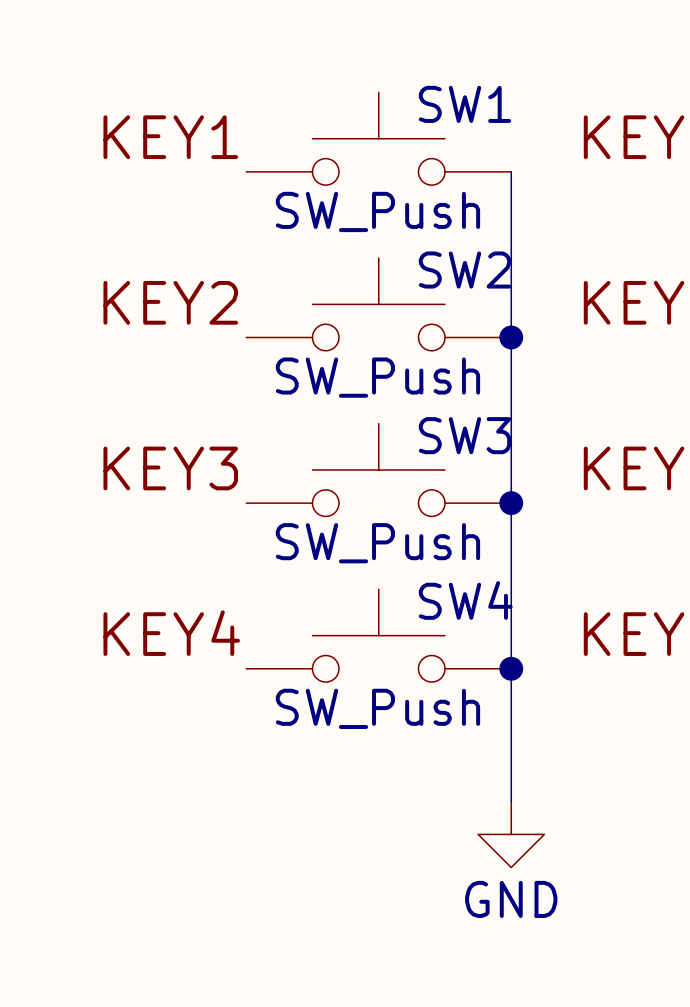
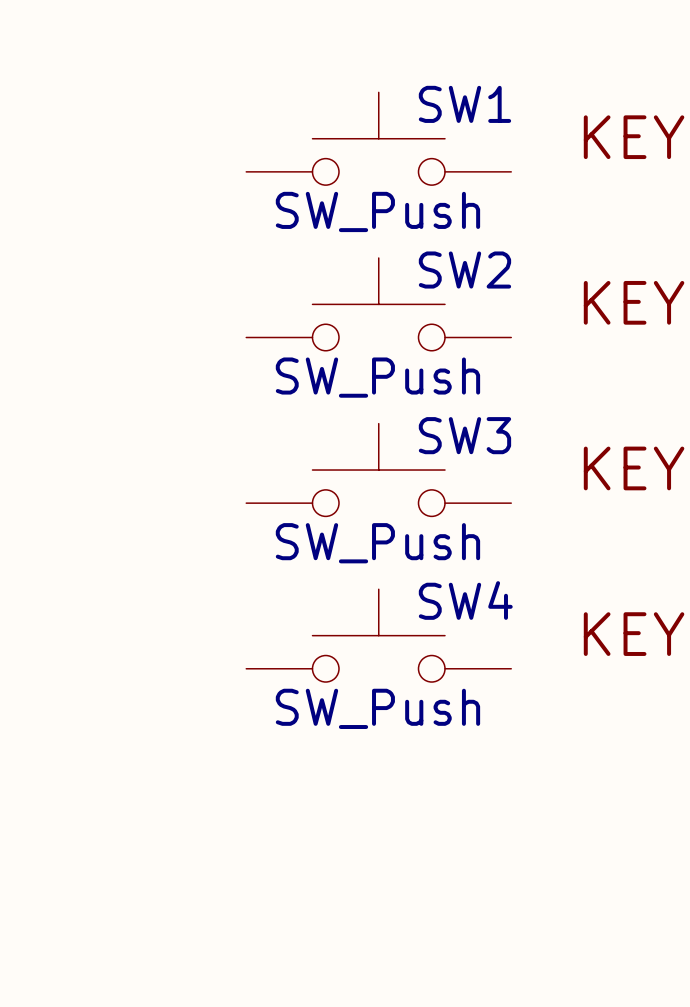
label: KEY1 (170, 137) -> none
wire: (511, 171) (511, 801) -> none
label: KEY2 (170, 302) -> none
junction: (511, 337) -> none
label: KEY3 (170, 468) -> none
junction: (511, 503) -> none
label: KEY4 (171, 633) -> none
junction: (511, 668) -> none
power symbol: GND (511, 834) -> none

